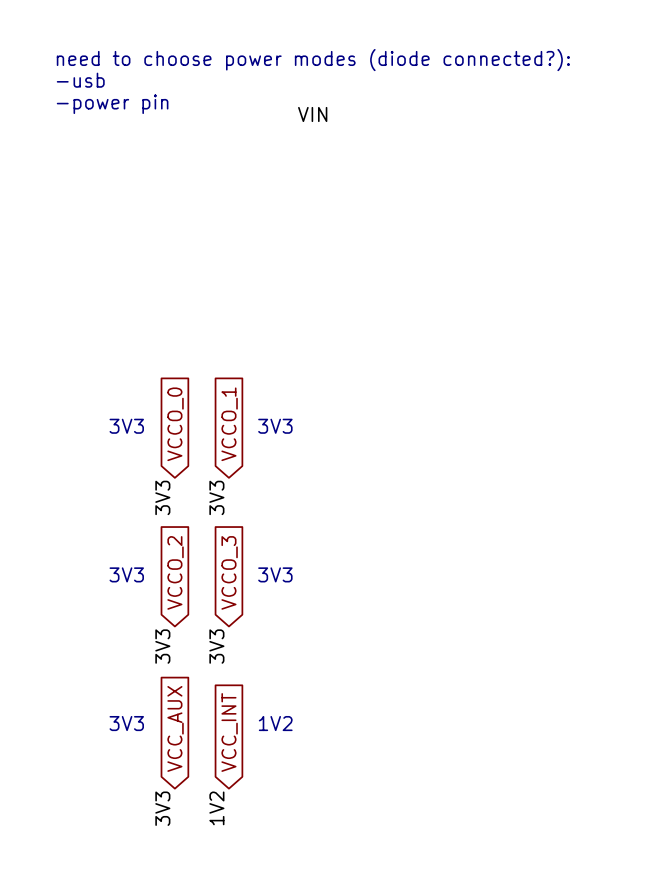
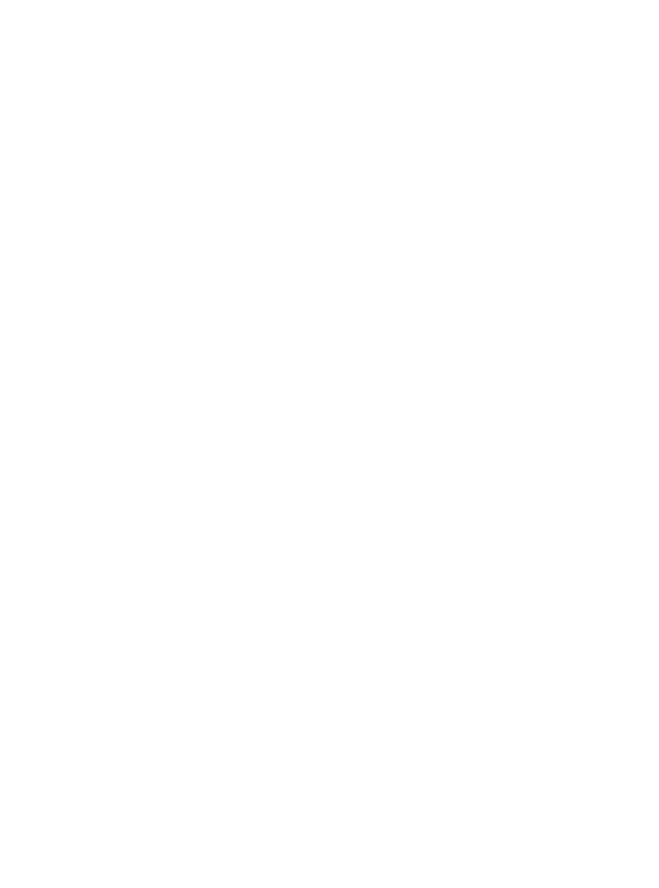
text: need to choose power modes (diode connected?): (313, 60) -> none
text: -usb (80, 80) -> none
text: -power pin (112, 104) -> none
label: VIN (312, 114) -> none
global label: VCCO_0 (175, 424) -> none
global label: VCCO_1 (229, 424) -> none
text: 3V3 (126, 426) -> none
text: 3V3 (275, 426) -> none
label: 3V3 (162, 497) -> none
label: 3V3 (216, 497) -> none
global label: VCCO_2 (175, 572) -> none
global label: VCCO_3 (229, 572) -> none
text: 3V3 (126, 574) -> none
text: 3V3 (275, 574) -> none
label: 3V3 (162, 646) -> none
label: 3V3 (216, 646) -> none
text: 3V3 (126, 723) -> none
text: 1V2 (275, 723) -> none
global label: VCC_AUX (175, 728) -> none
global label: VCC_INT (229, 732) -> none
label: 3V3 (162, 808) -> none
label: 1V2 (216, 808) -> none

